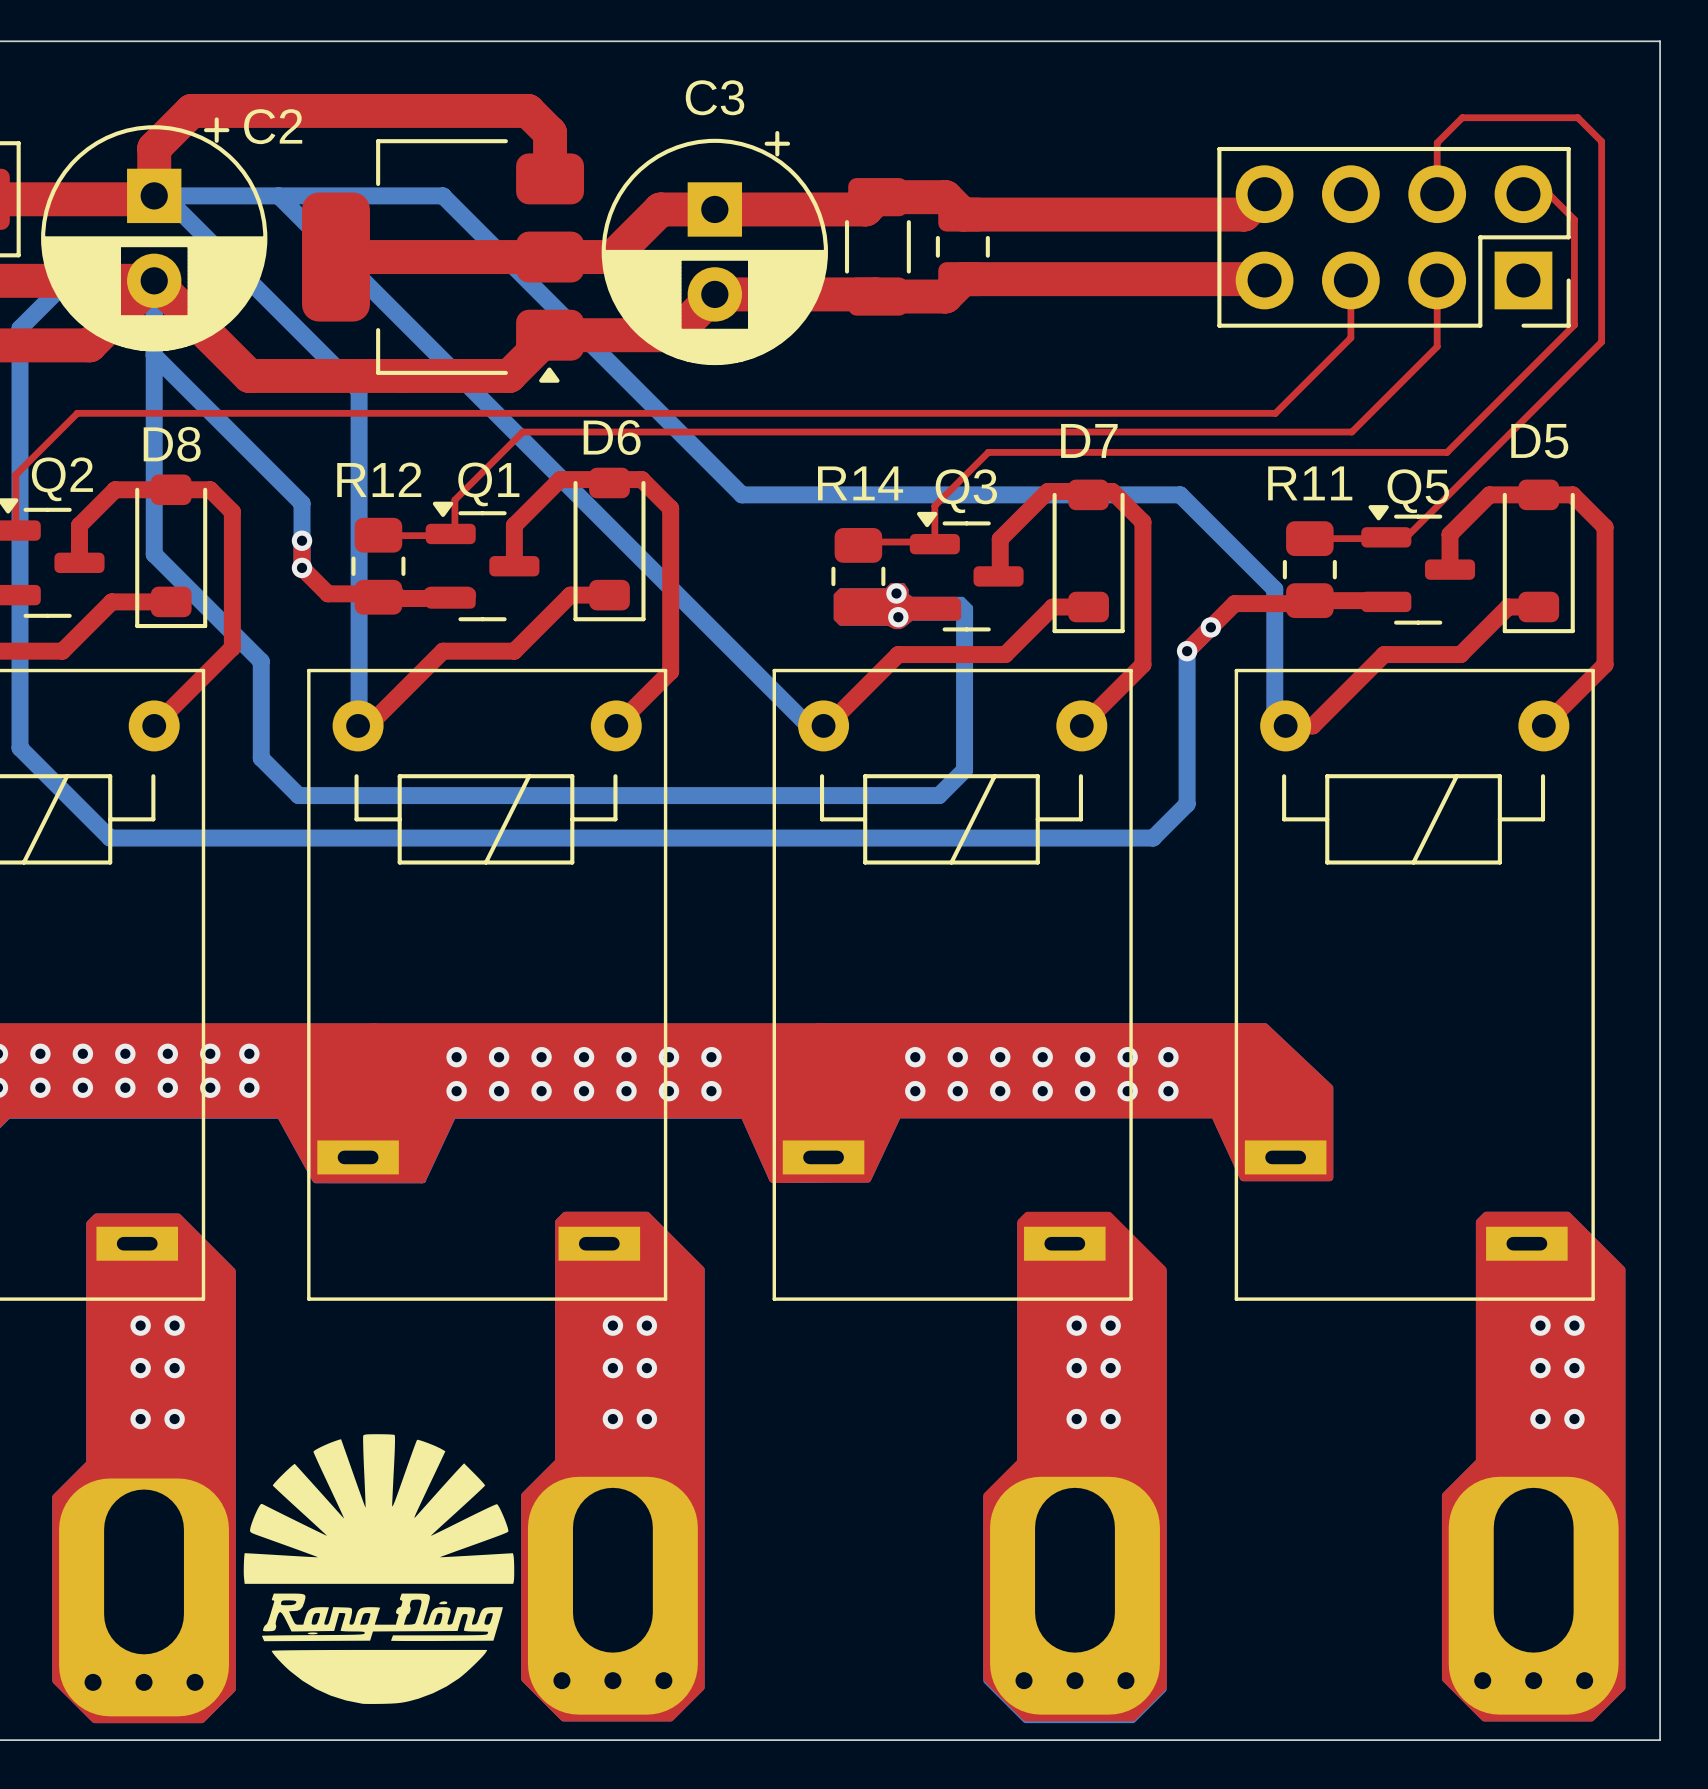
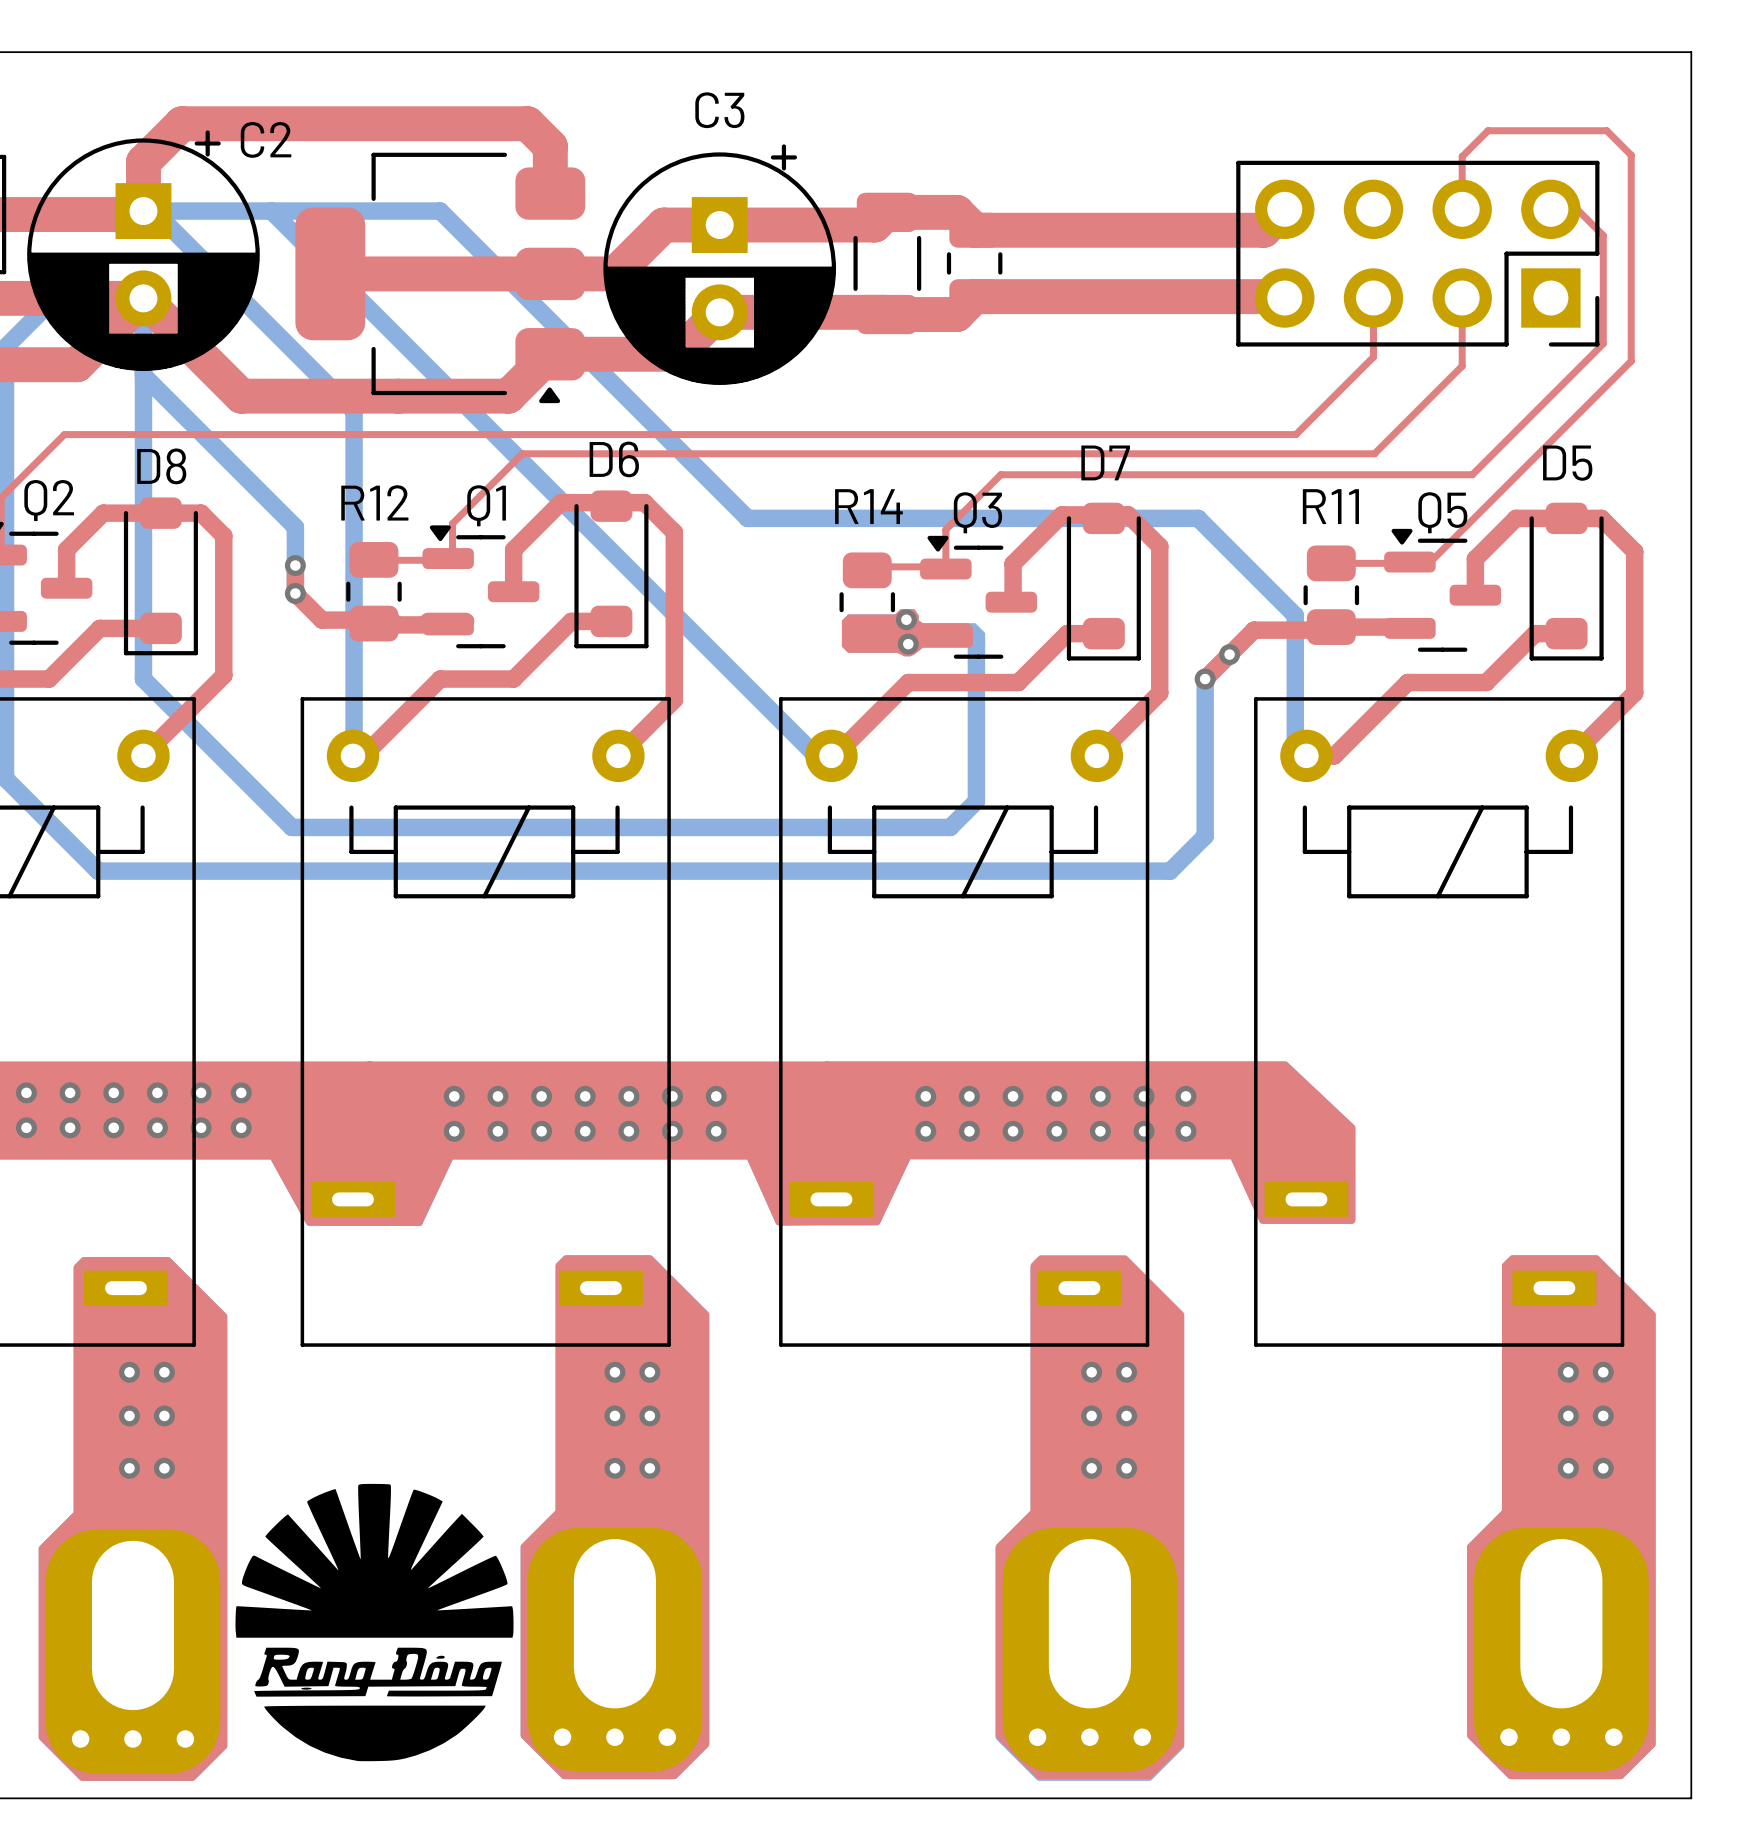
bottom track: (154, 554) (261, 661) (261, 758) -> (143, 579) (143, 679) (253, 789)

